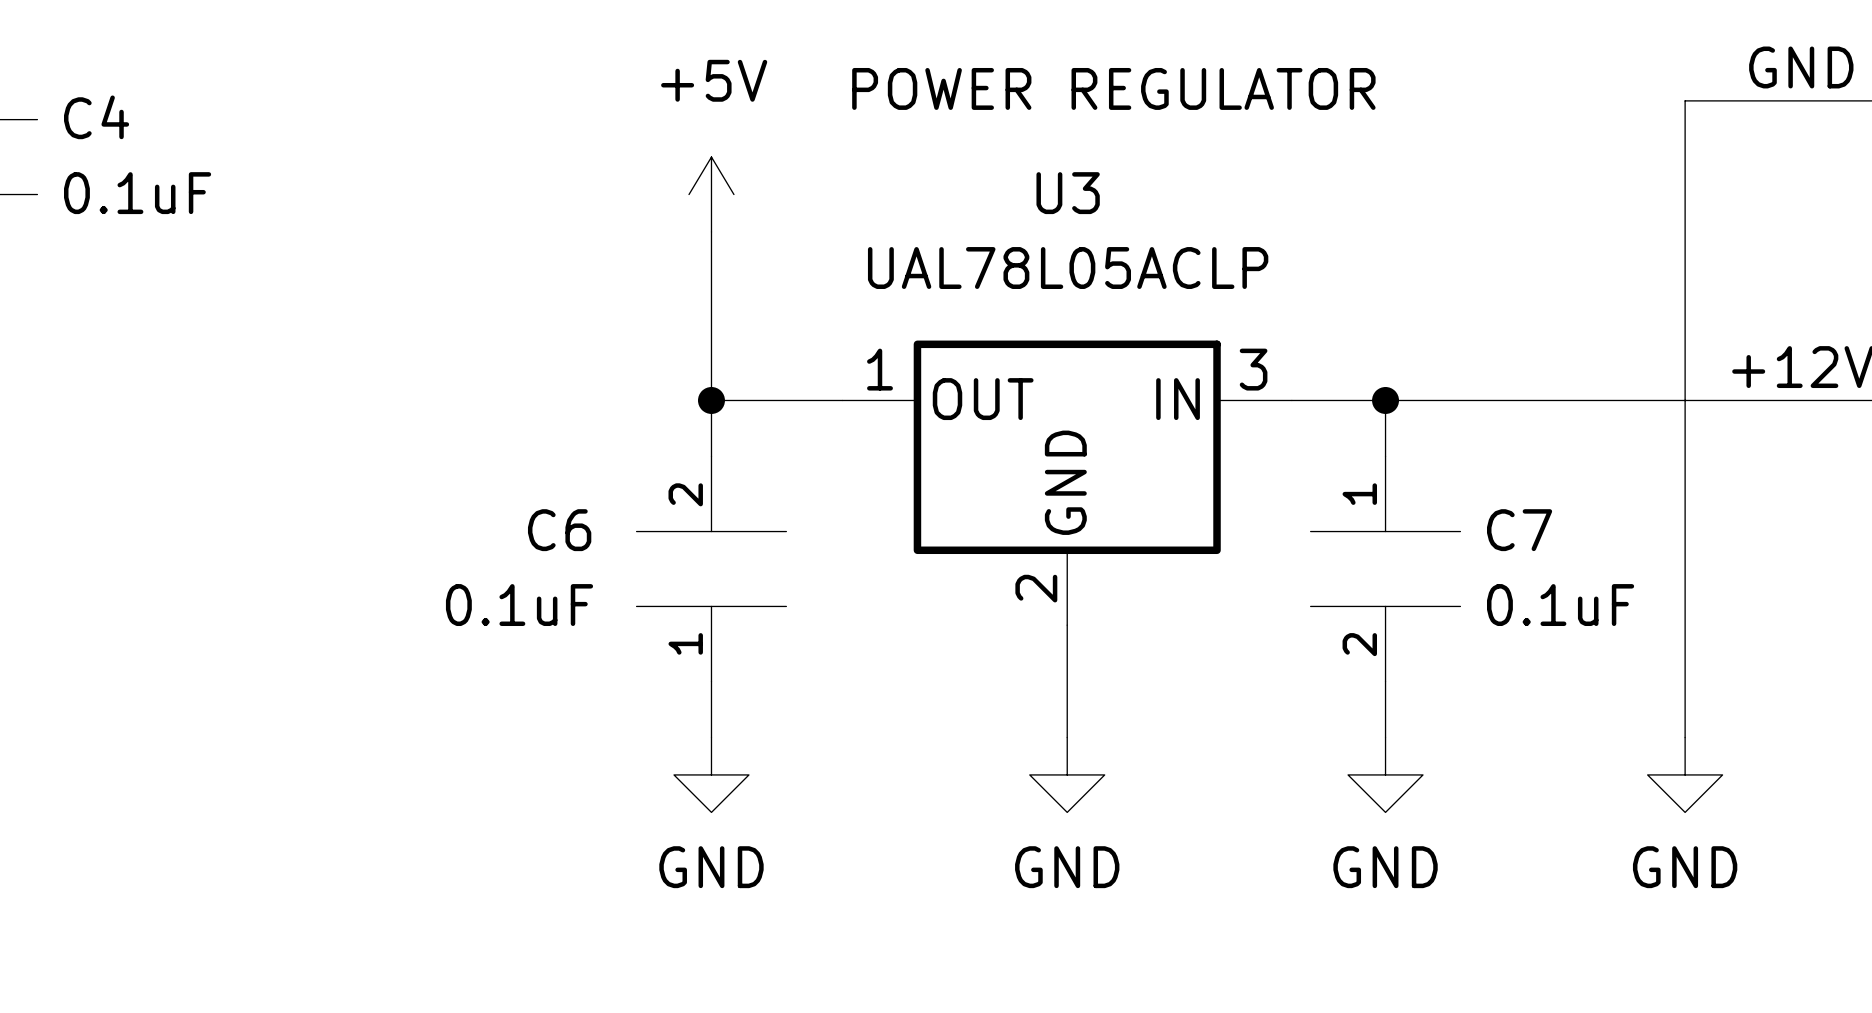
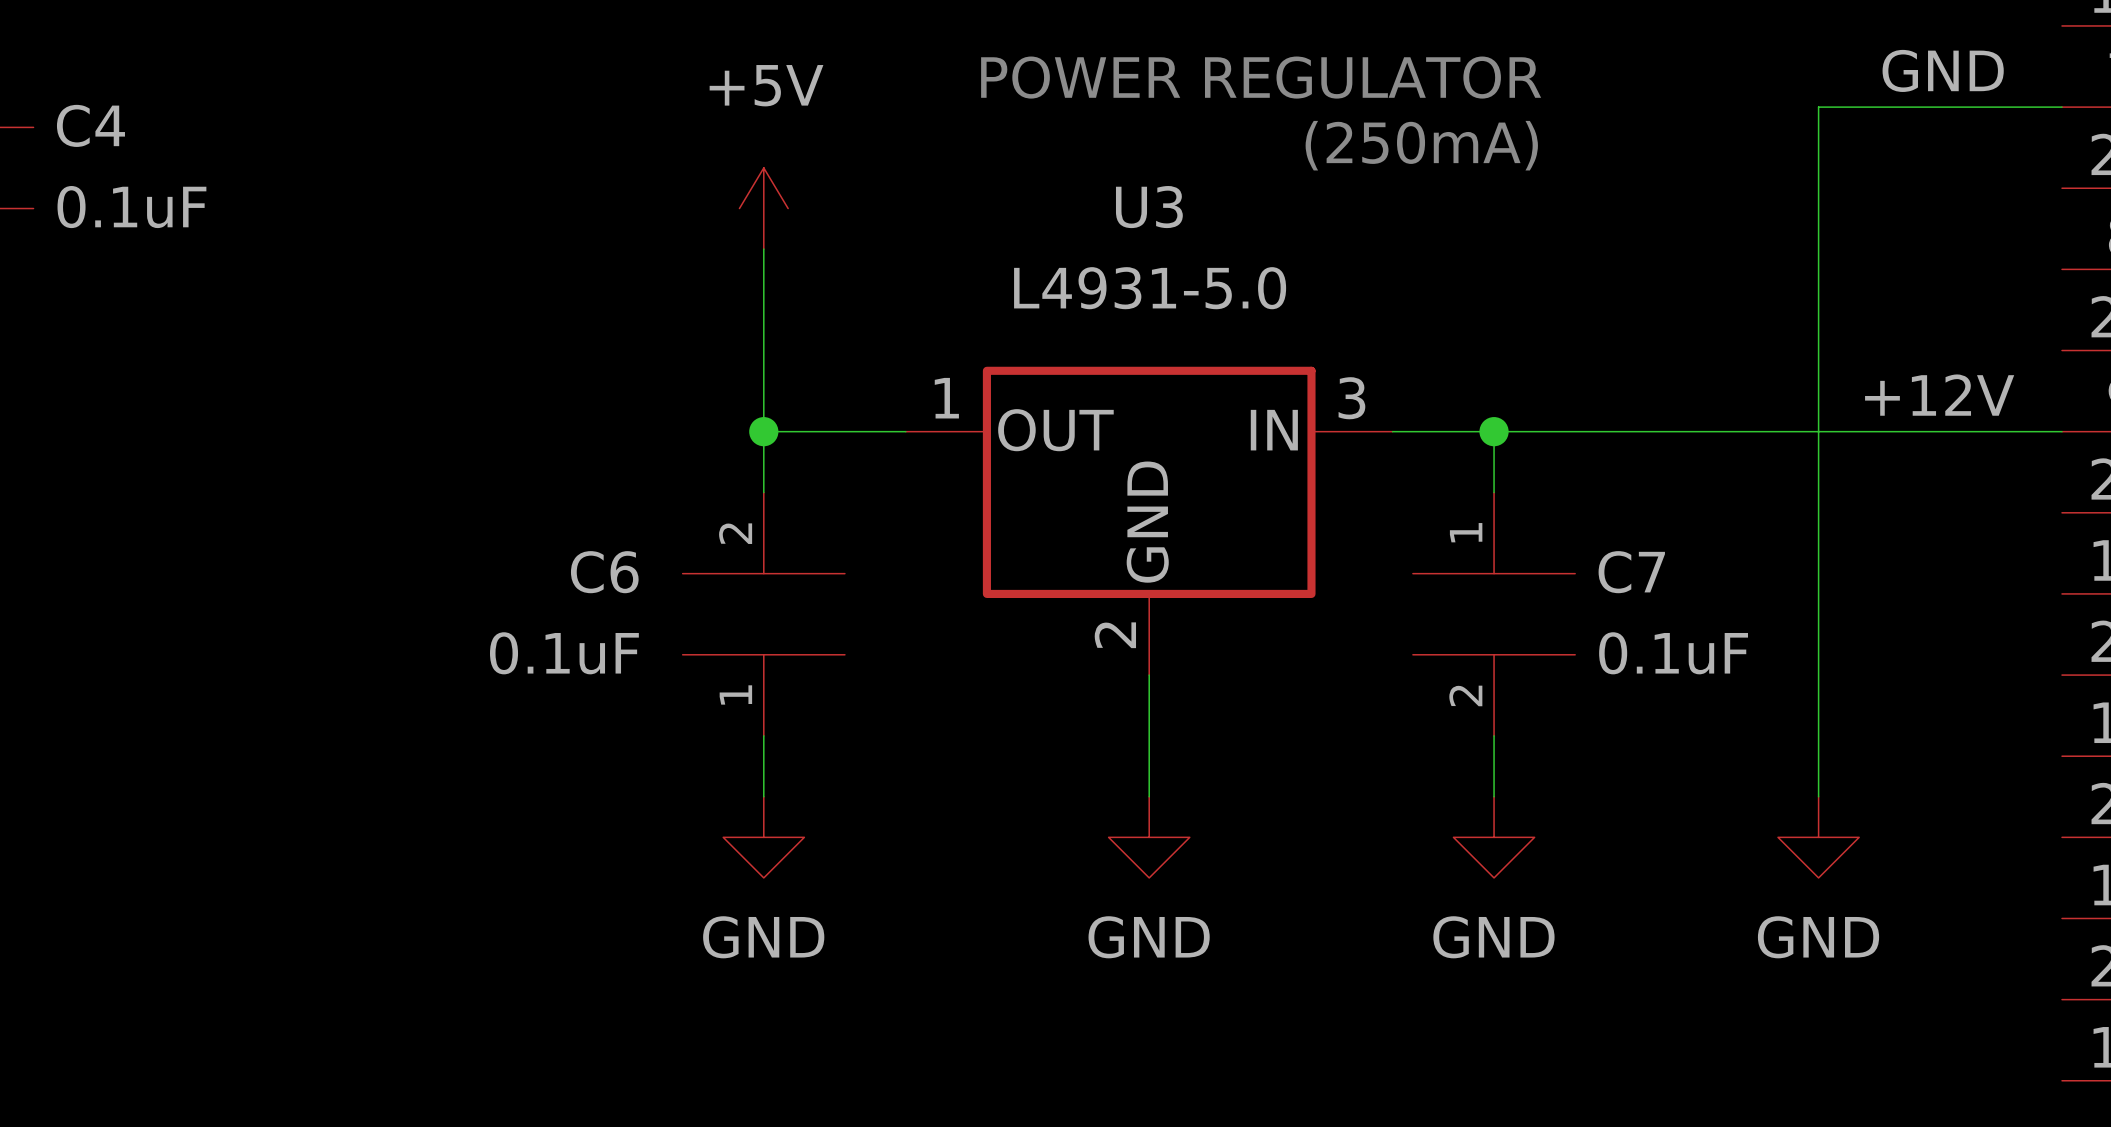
text position: POWER REGULATOR (1113, 88) -> POWER REGULATOR (1261, 77)
text: none -> (250mA) (1421, 145)
U3 value: UAL78L05ACLP (1068, 268) -> L4931-5.0 (1150, 288)

